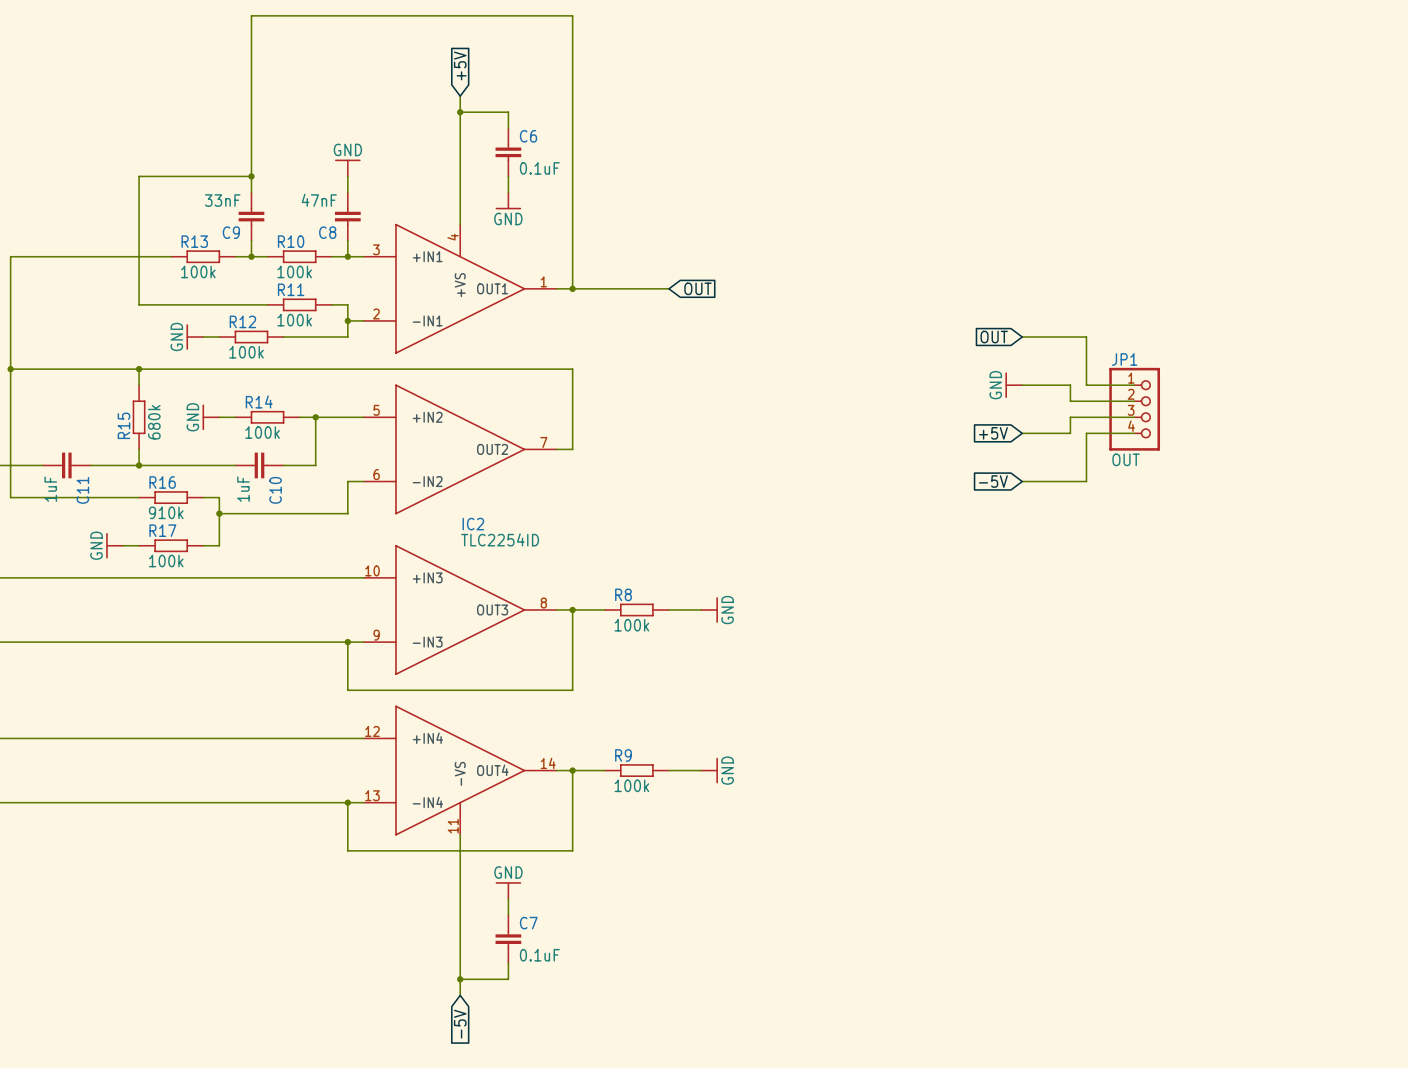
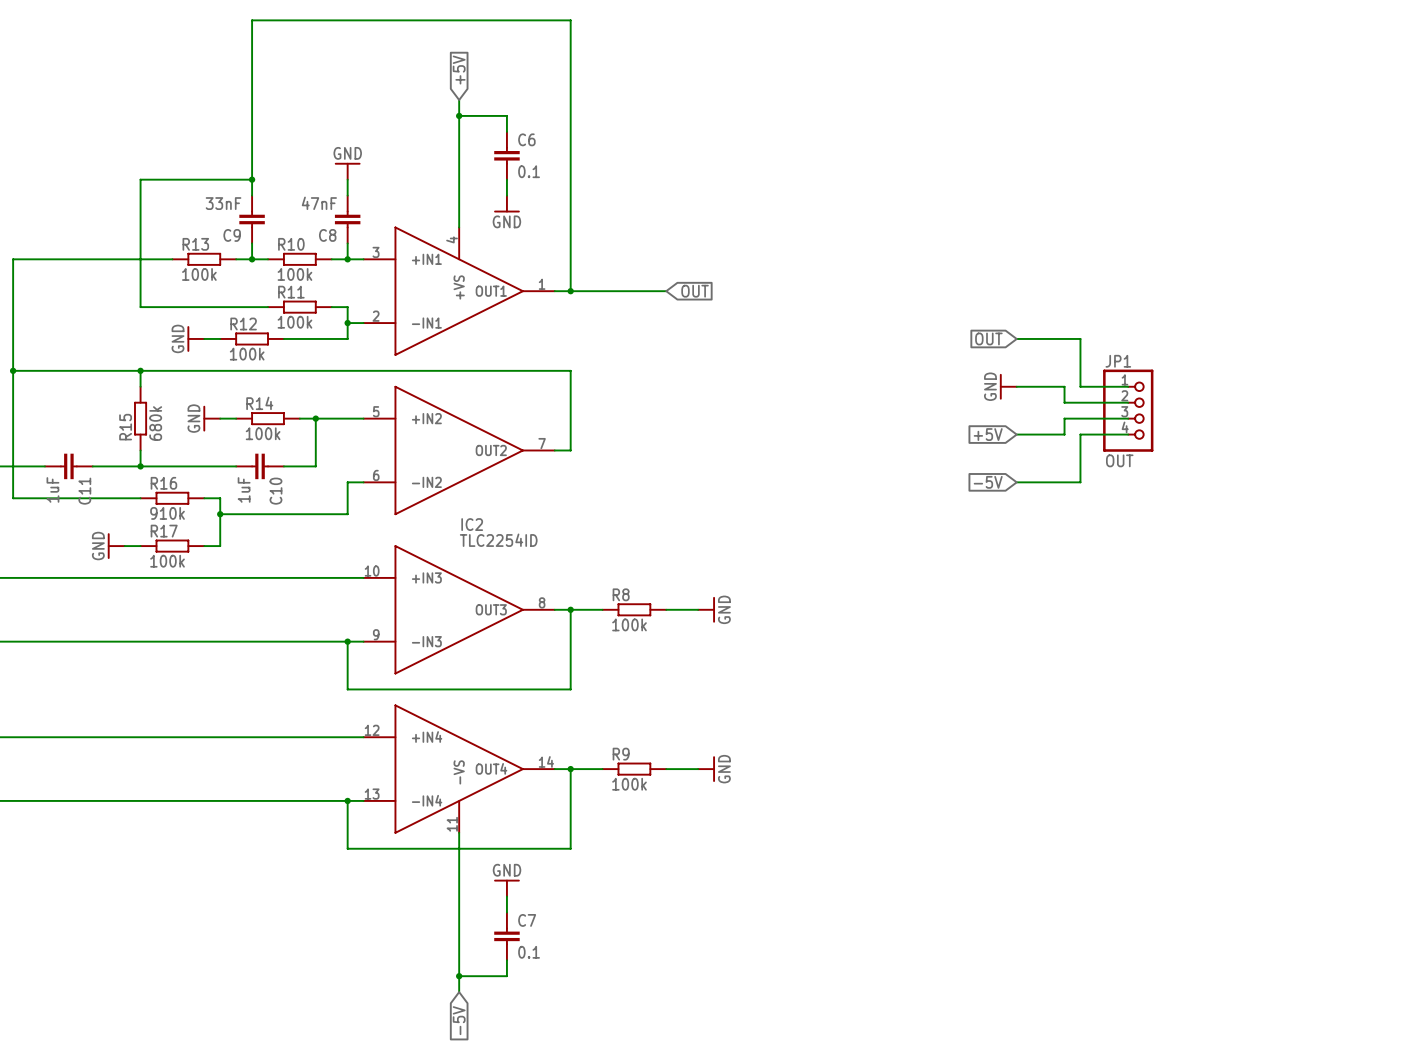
C6 value: 0.1uF (539, 168) -> 0.1 (529, 171)
C7 value: 0.1uF (539, 955) -> 0.1 (529, 952)

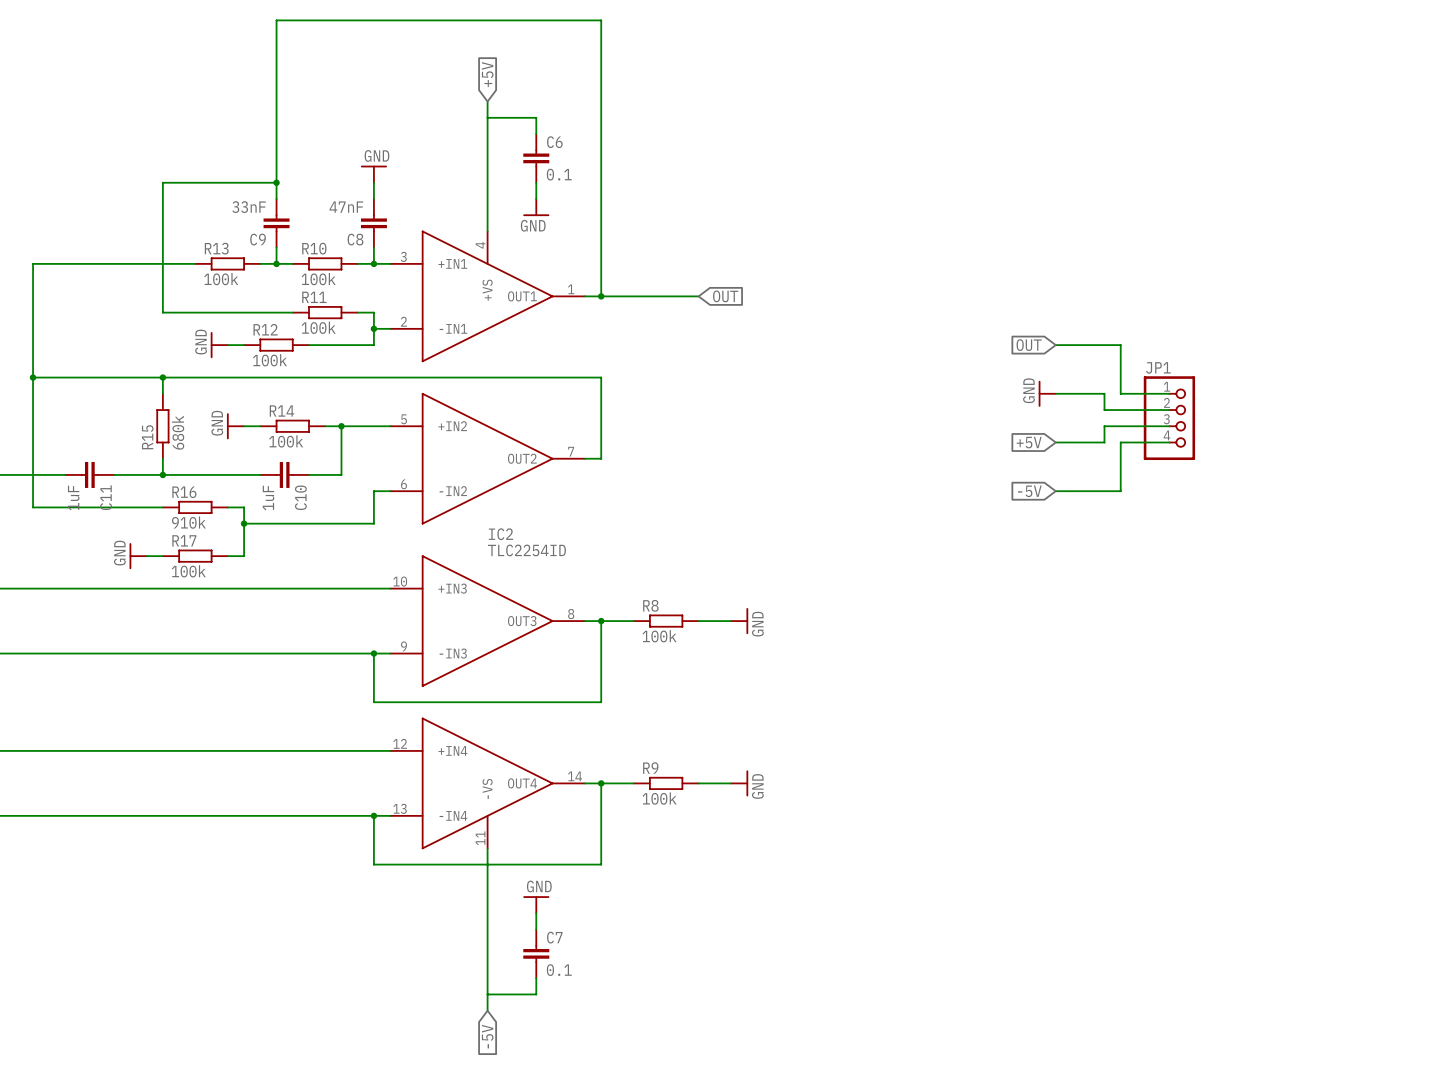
junction: (459, 115) -> none
JP1 value: OUT (1119, 460) -> none
junction: (459, 976) -> none

